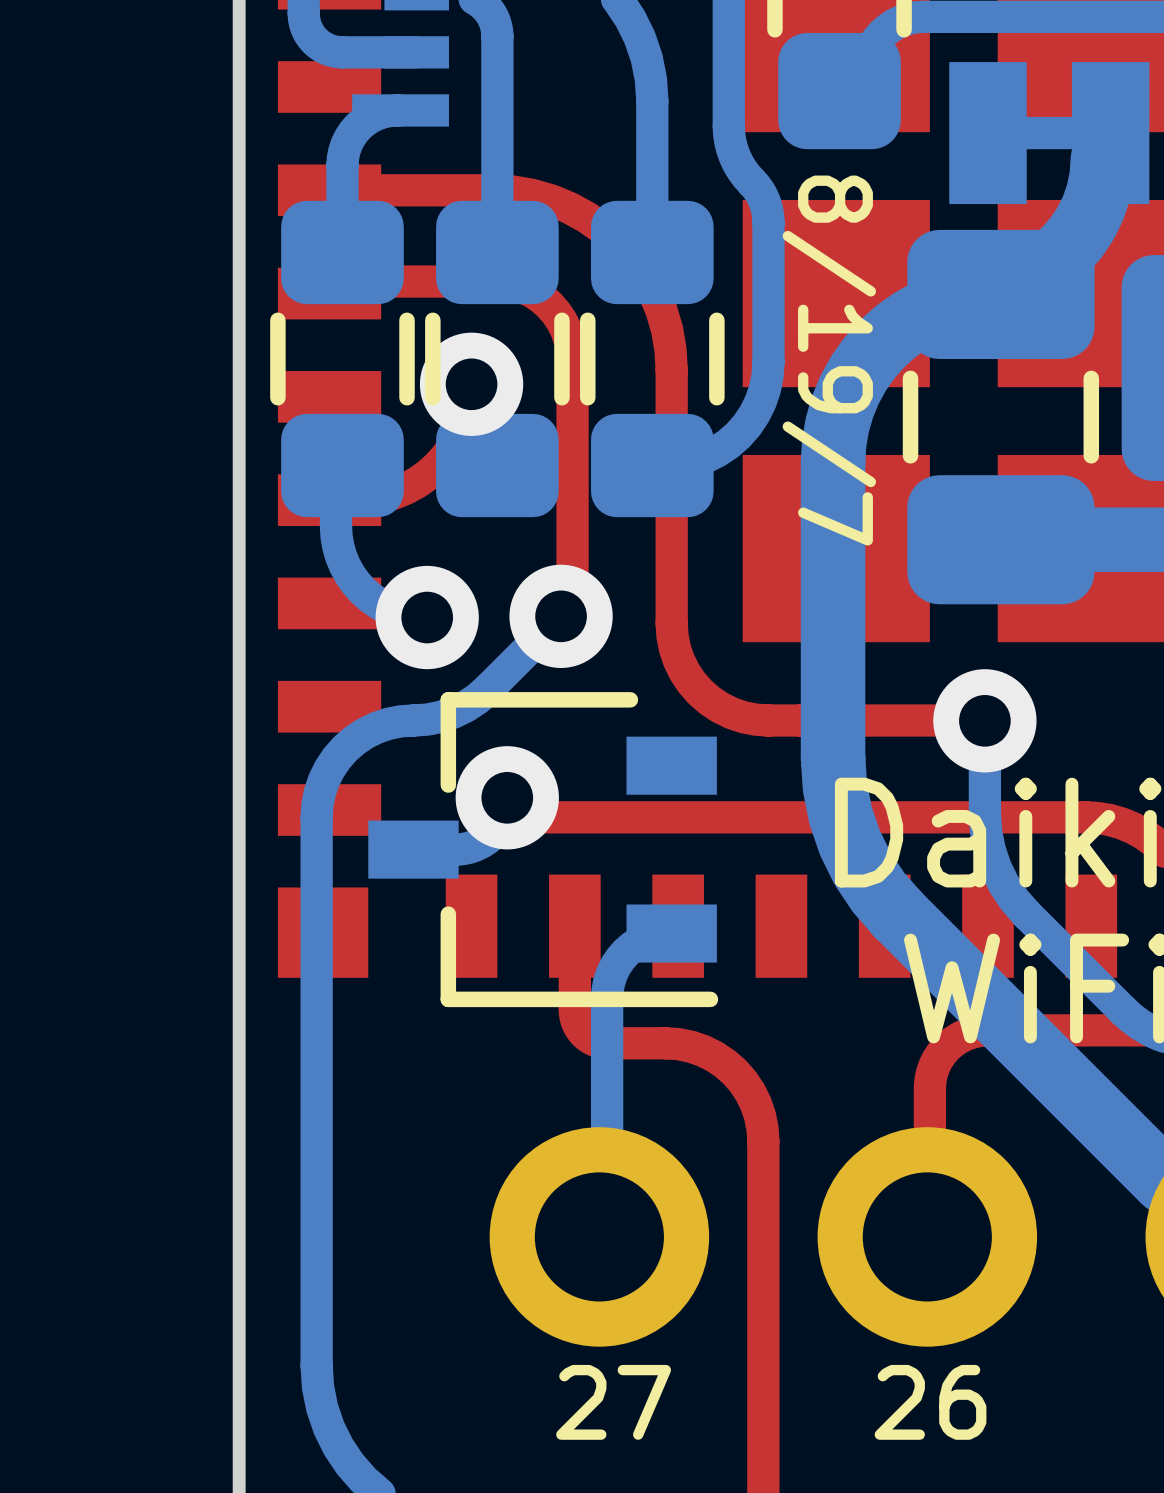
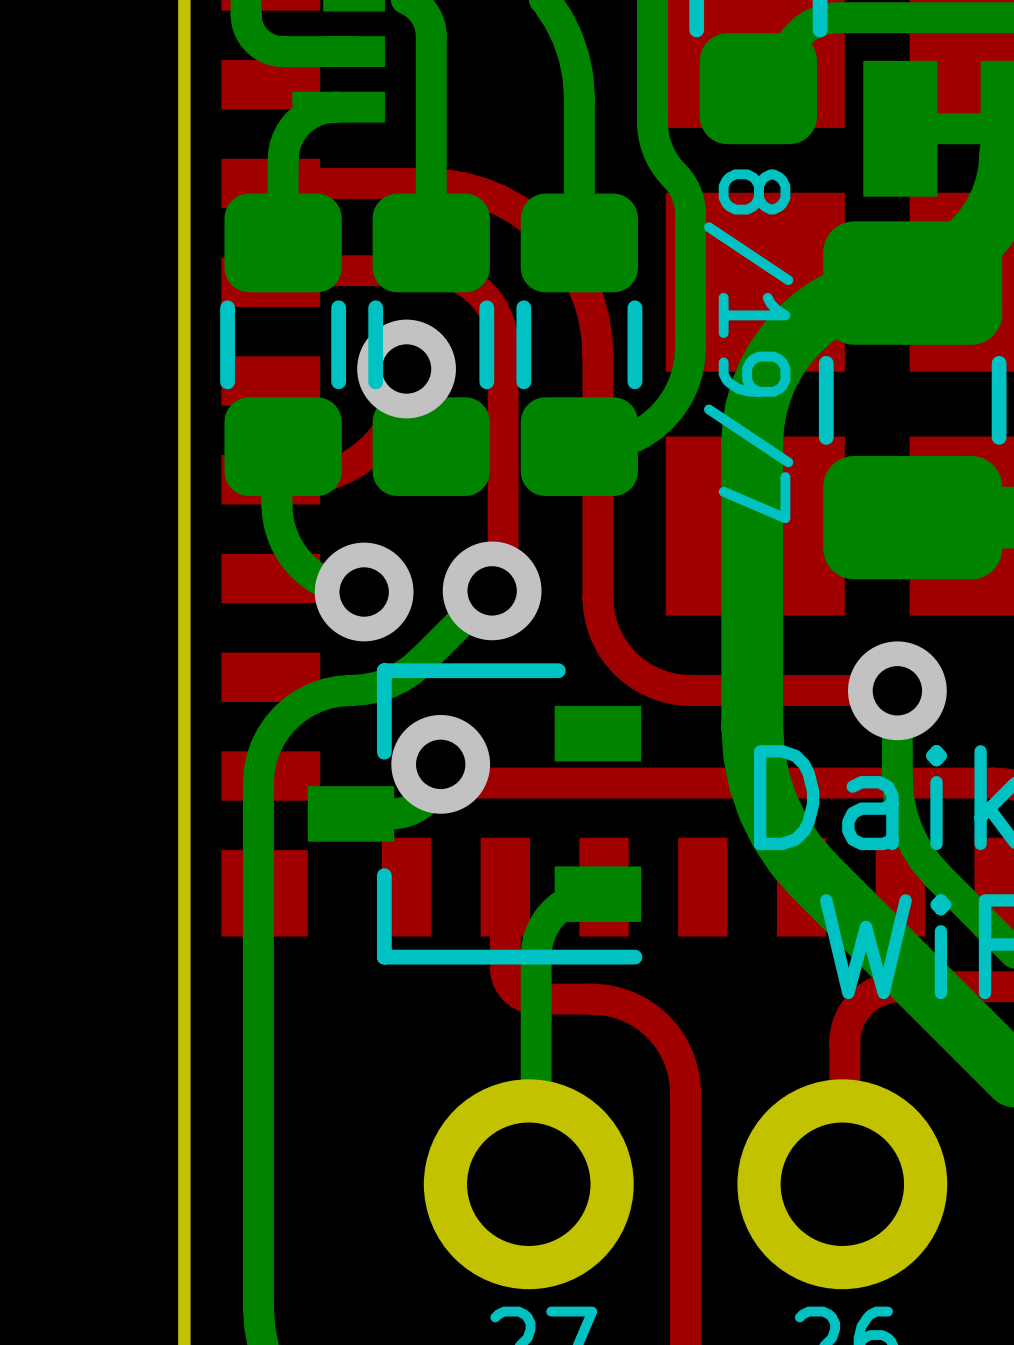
part footprint: [270, 200, 415, 518] -> [220, 193, 347, 497]
part footprint: [425, 200, 570, 518] -> [368, 193, 495, 497]
part footprint: [580, 200, 725, 518] -> [516, 193, 643, 497]

